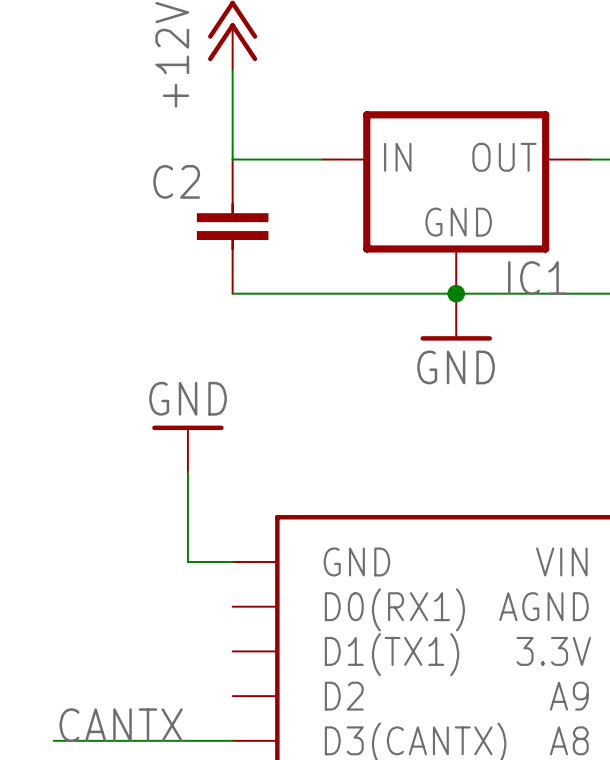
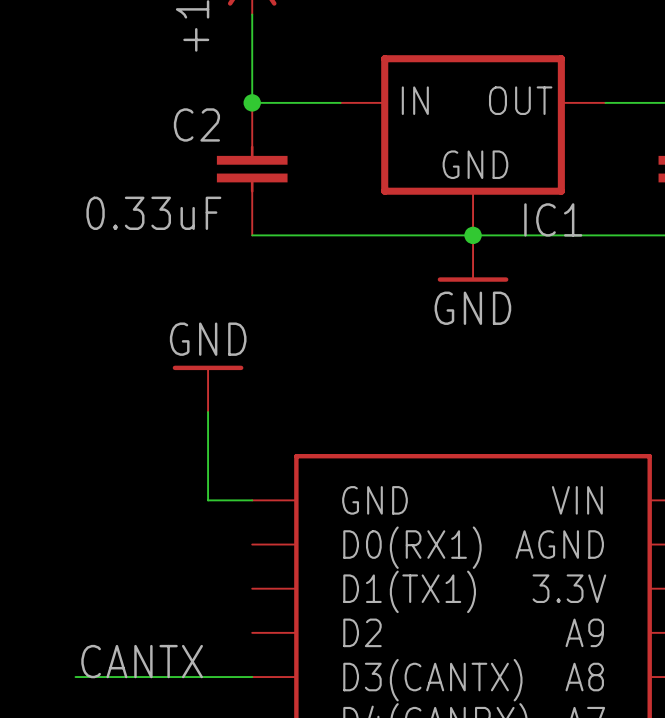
junction: none -> (252, 102)
C2 value: none -> 0.33uF (153, 213)

